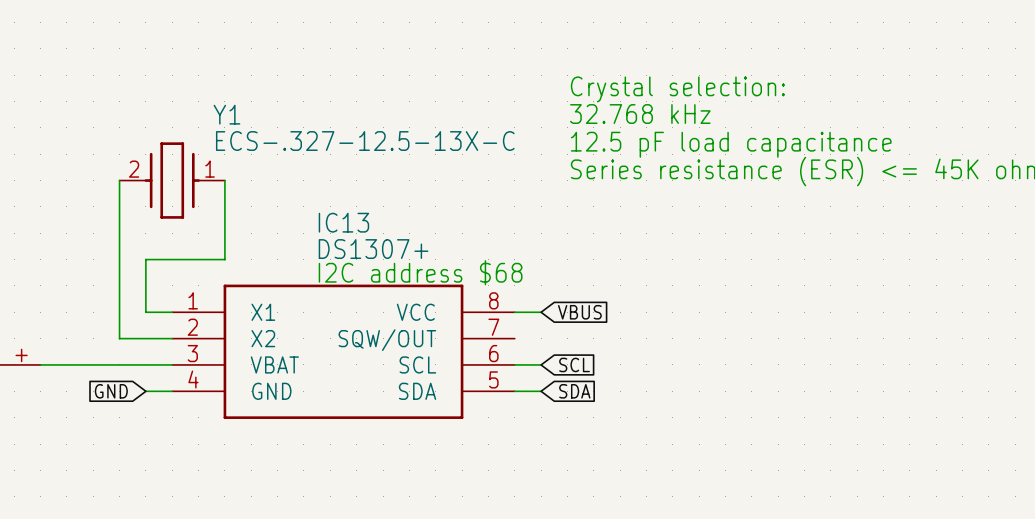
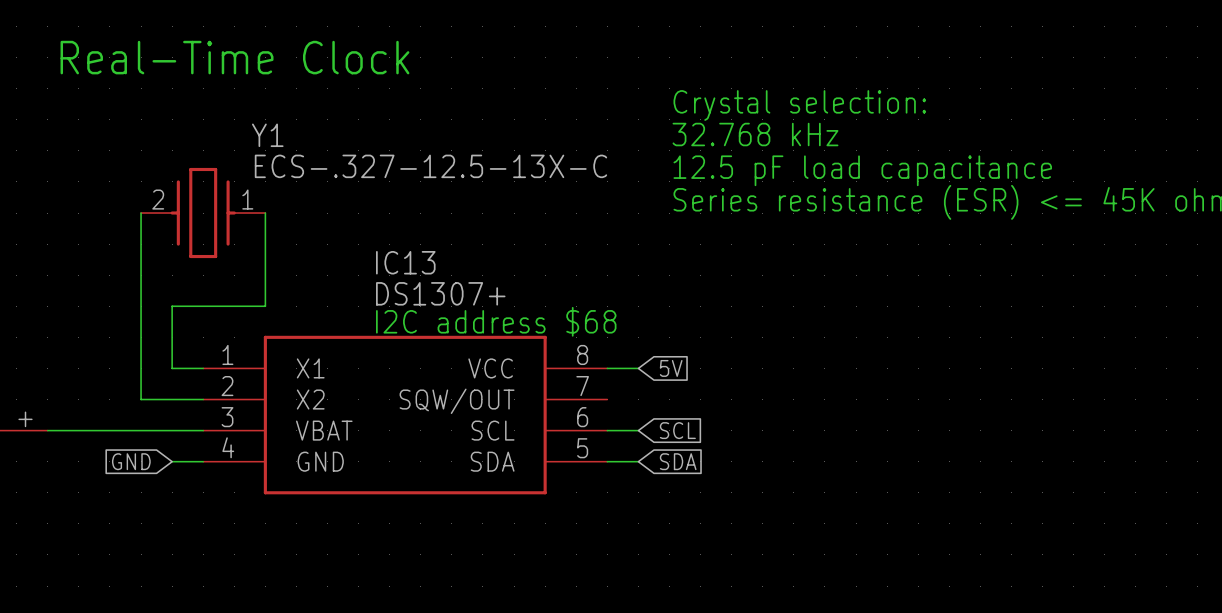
text: none -> Real-Time Clock (234, 57)
global label: VBUS (579, 312) -> 5V (671, 368)

